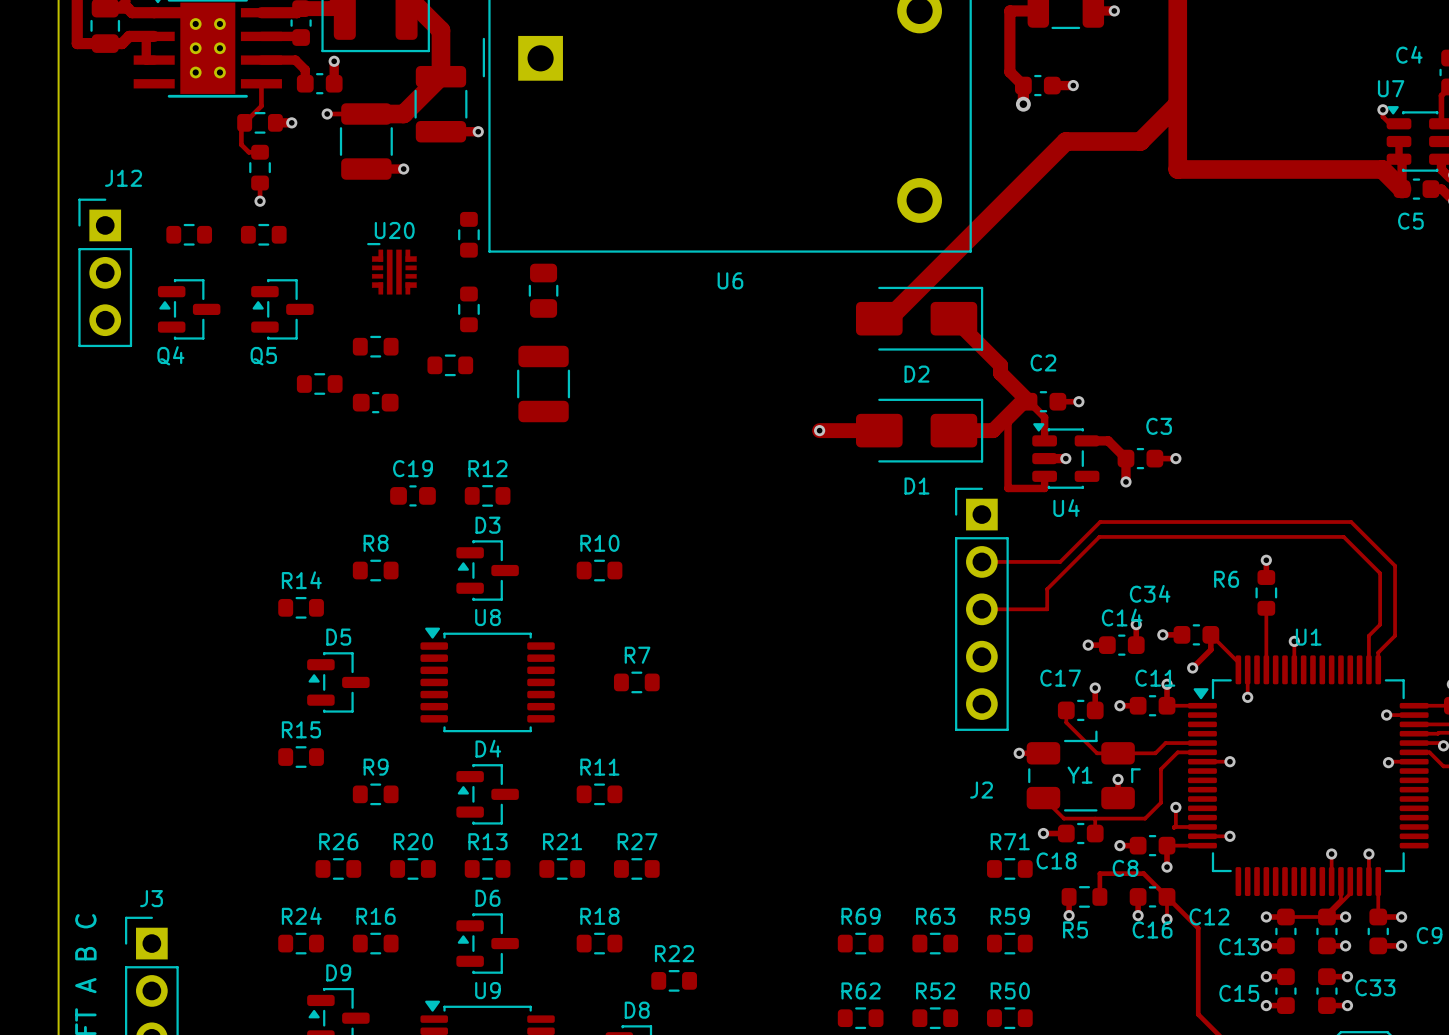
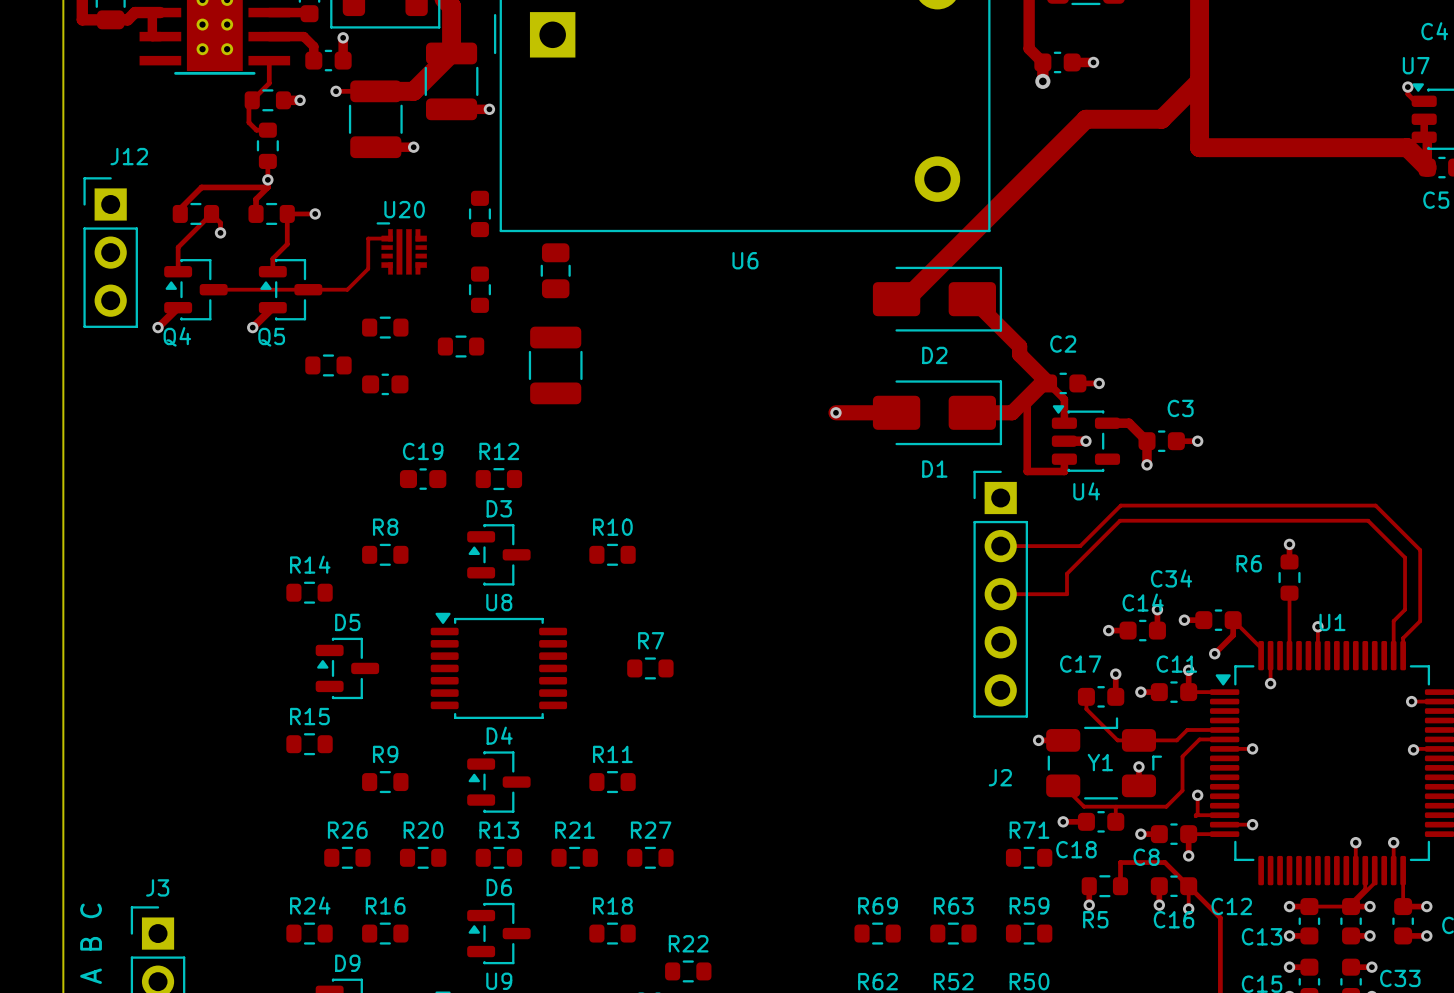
track: none -> (267, 187) (256, 199) (256, 213)
track: none -> (267, 187) (201, 187) (180, 208) (180, 213)
track: none -> (315, 213) (287, 213) (287, 244) (272, 258) (272, 271)
via: none -> (315, 213)
track: none -> (220, 232) (220, 222) (211, 213) (178, 247) (178, 271)
via: none -> (220, 232)
track: none -> (387, 238) (368, 238) (368, 268) (347, 289) (213, 289)
track: none -> (178, 307) (158, 327)
track: none -> (272, 307) (252, 327)
via: none -> (158, 327)
via: none -> (252, 327)

